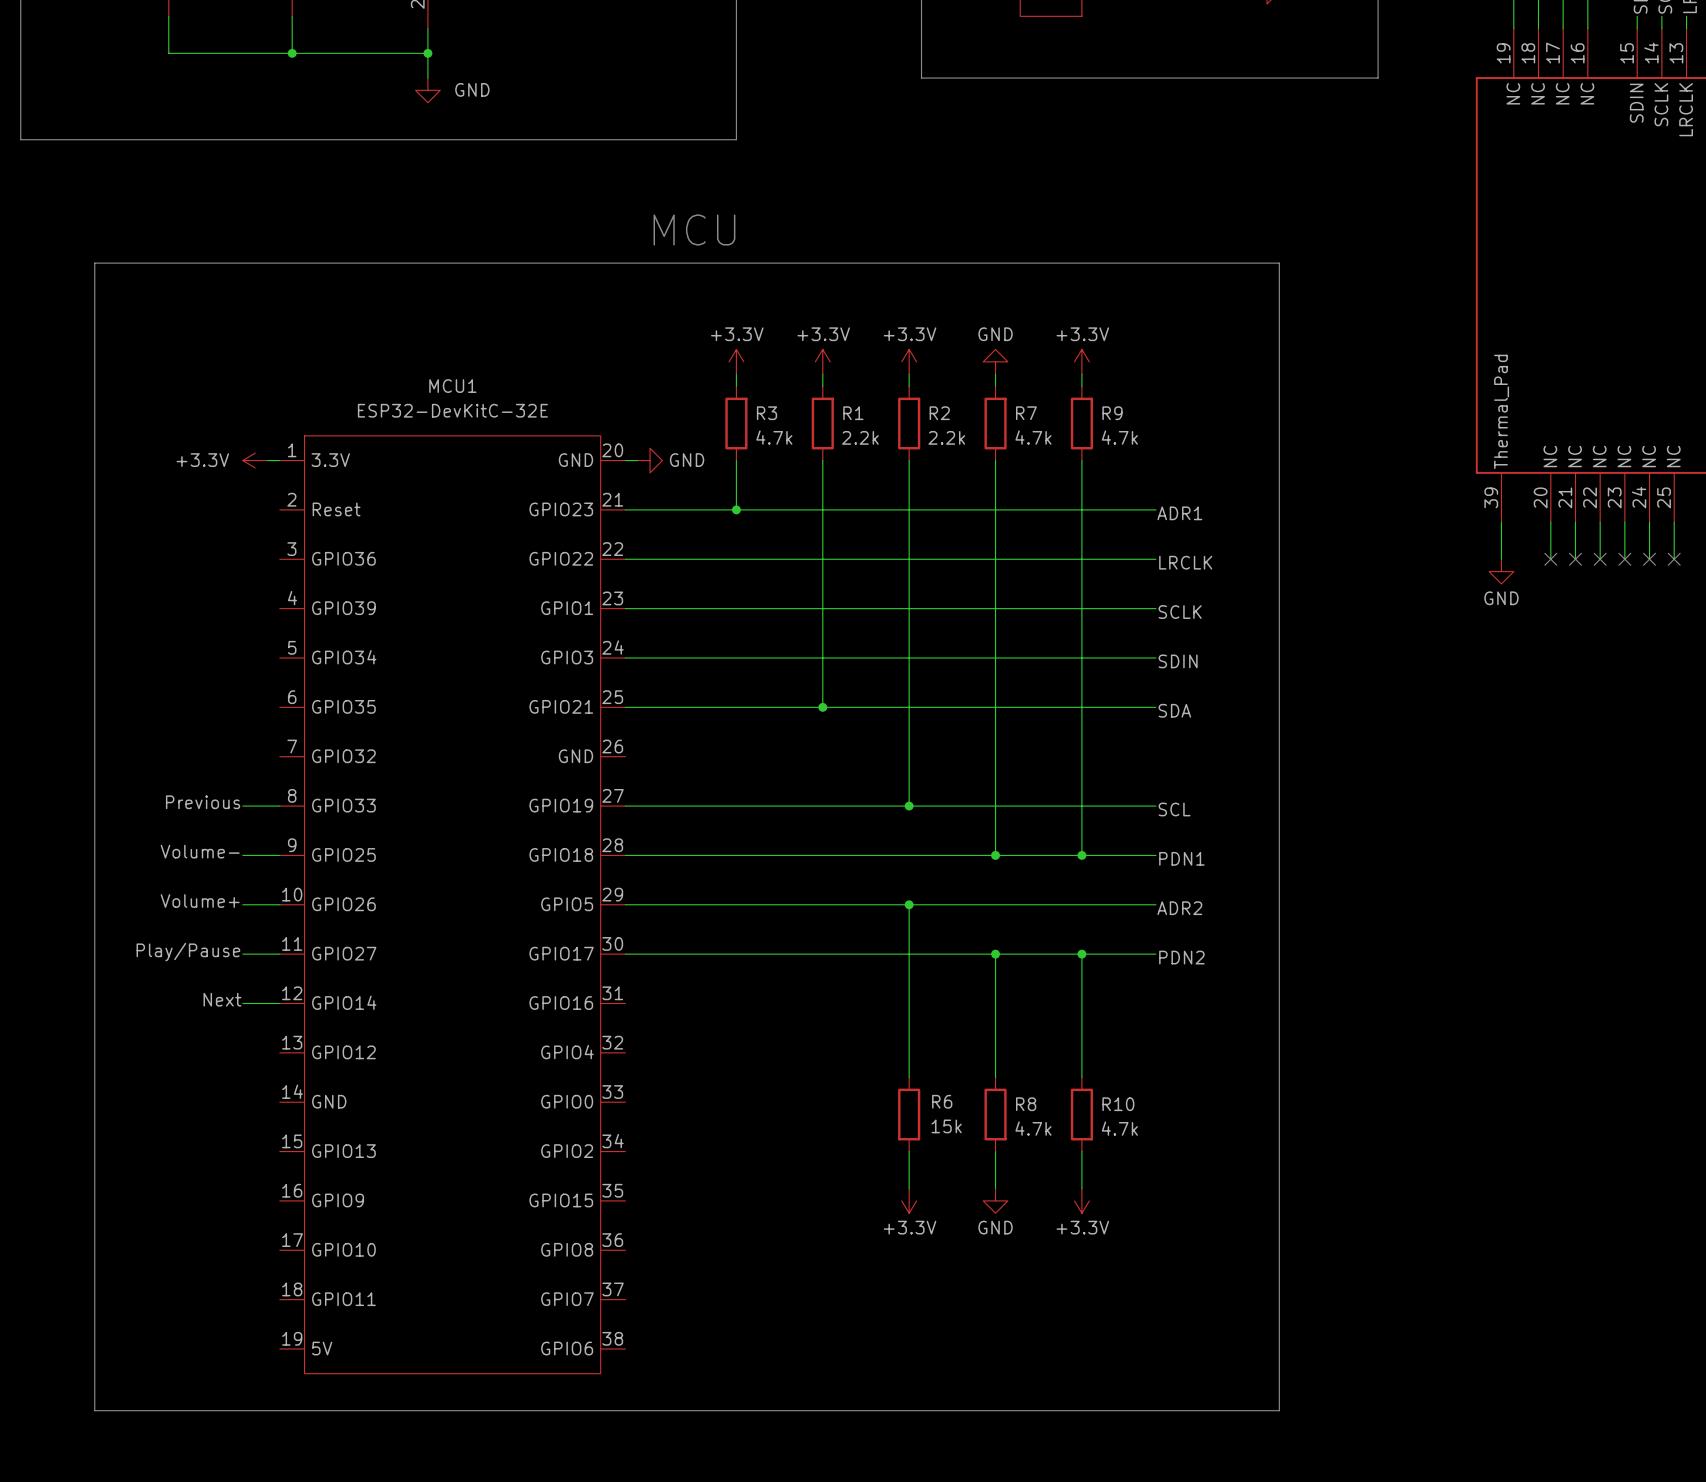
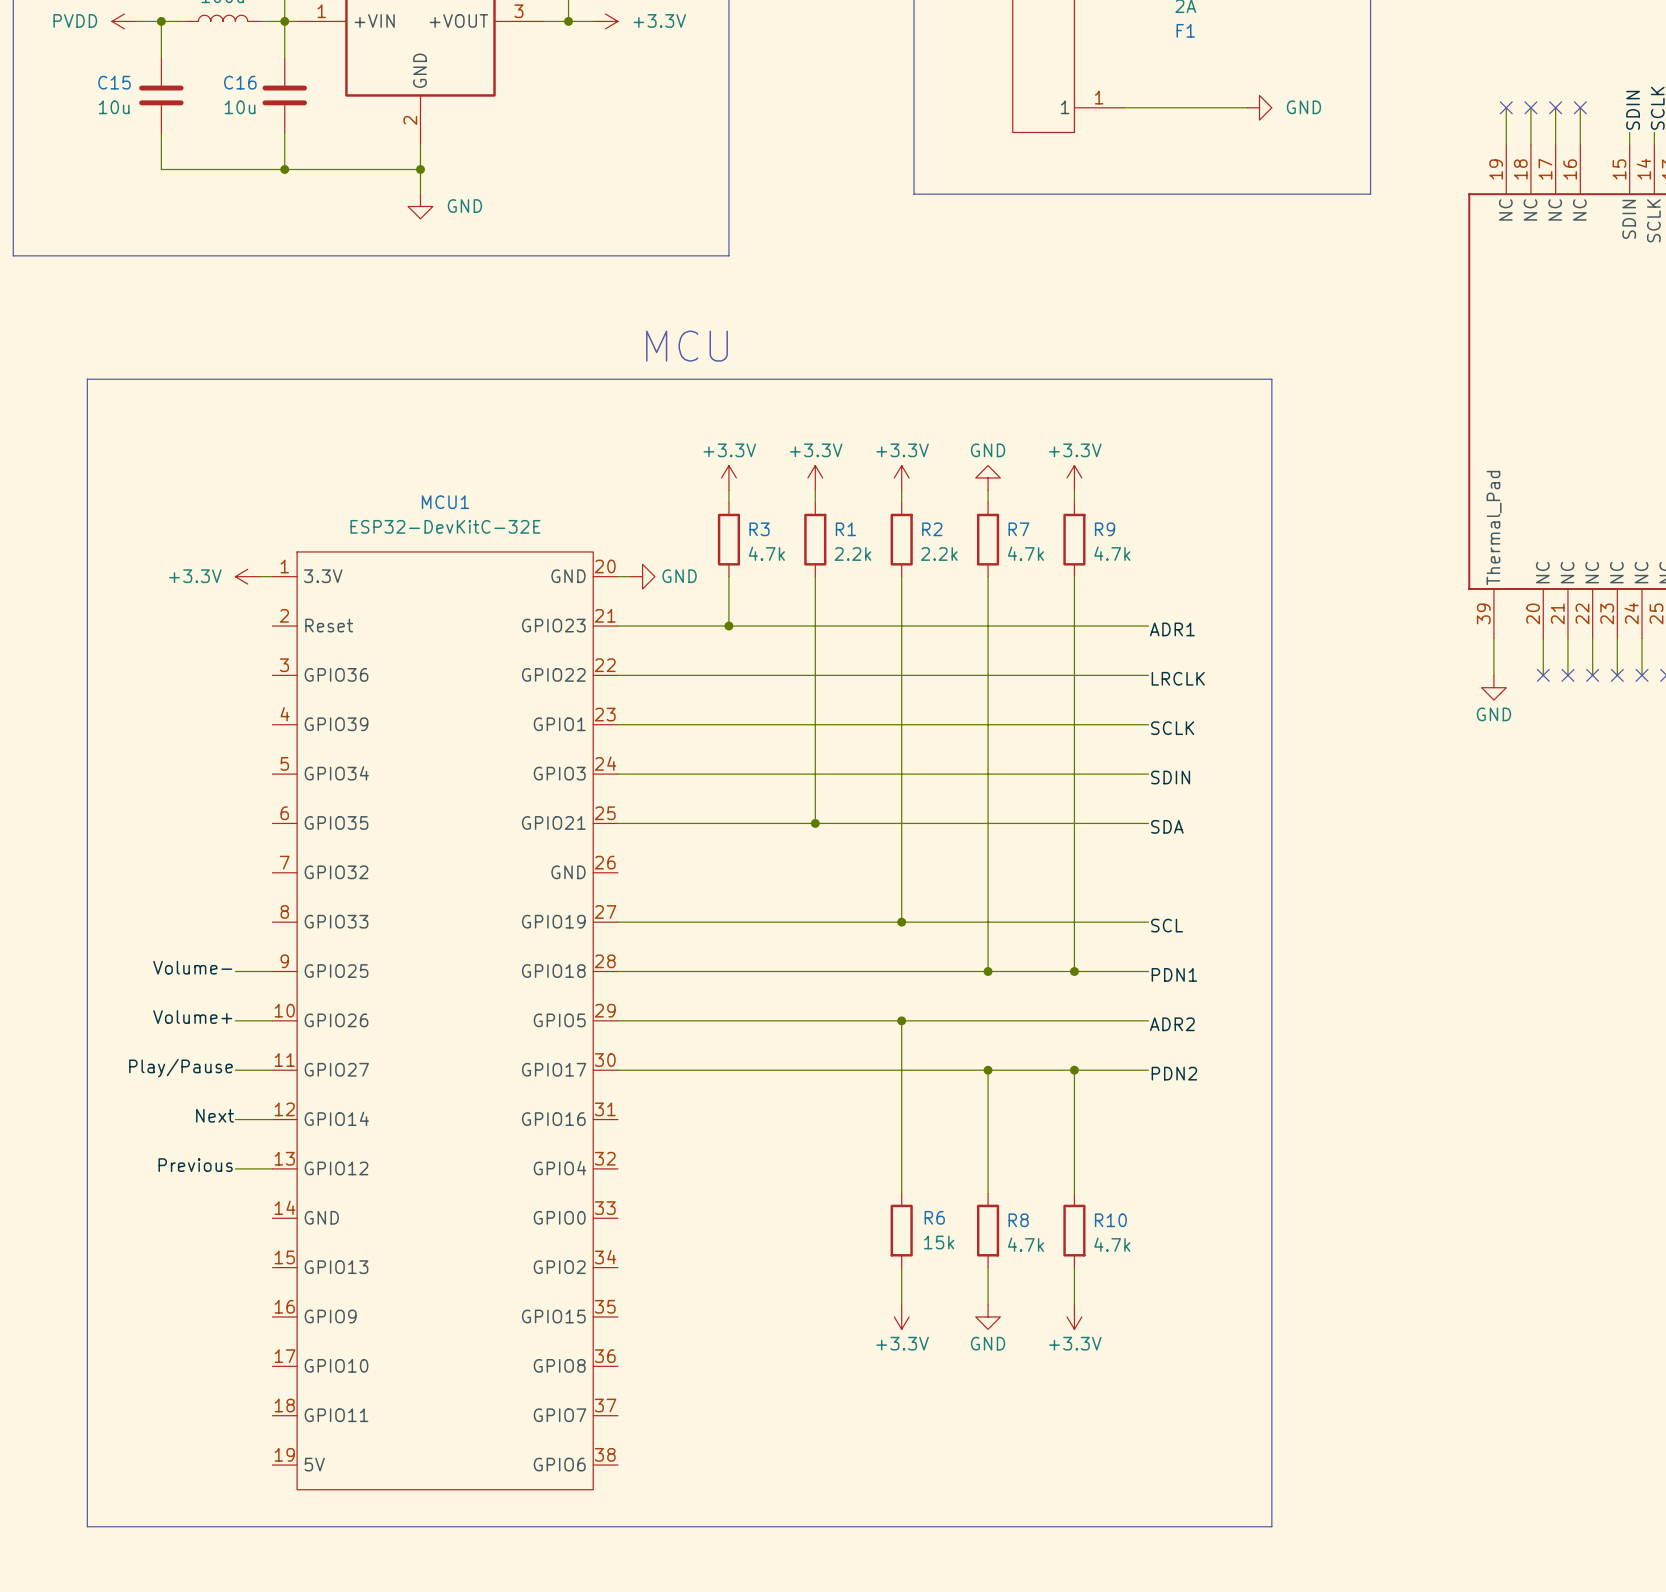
label: Previous (203, 802) -> none
wire: (242, 806) (279, 806) -> none
label: none -> Previous (195, 1165)
wire: none -> (235, 1168) (272, 1168)

